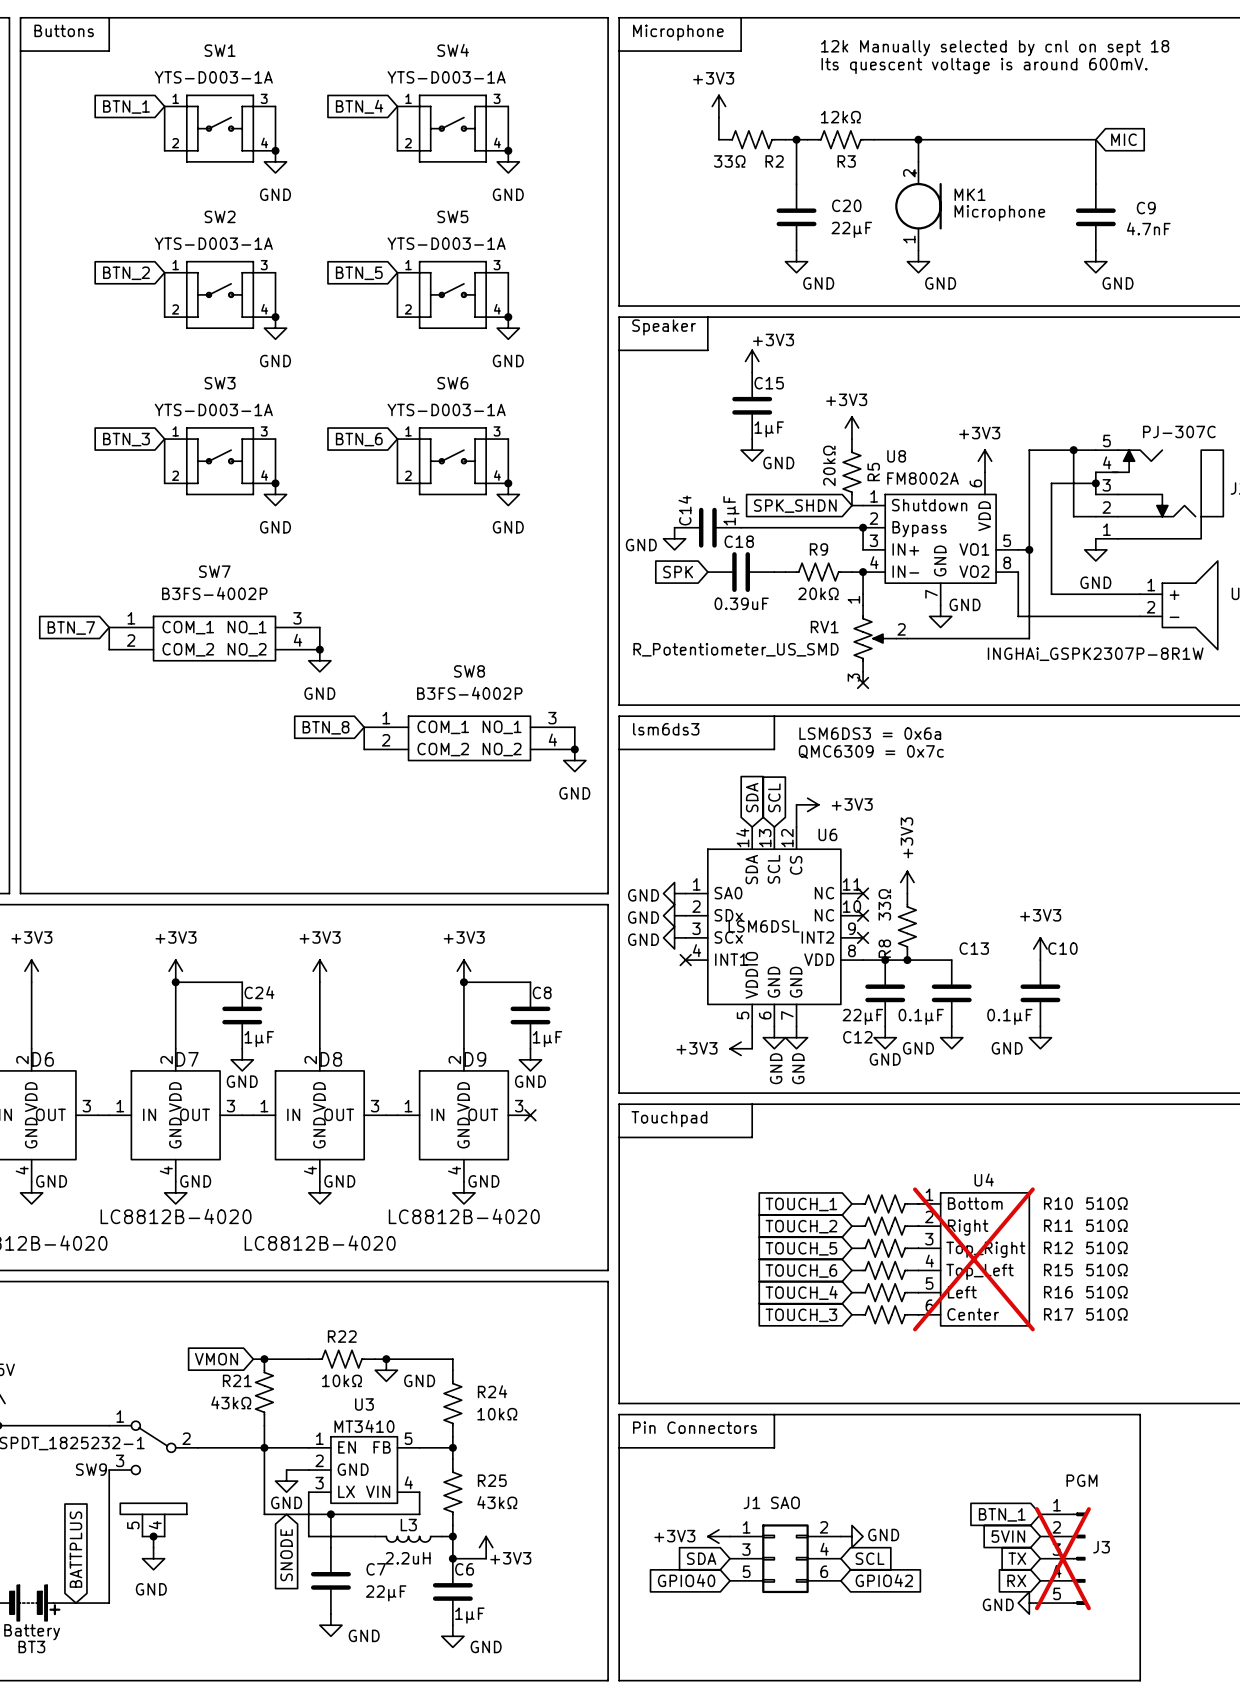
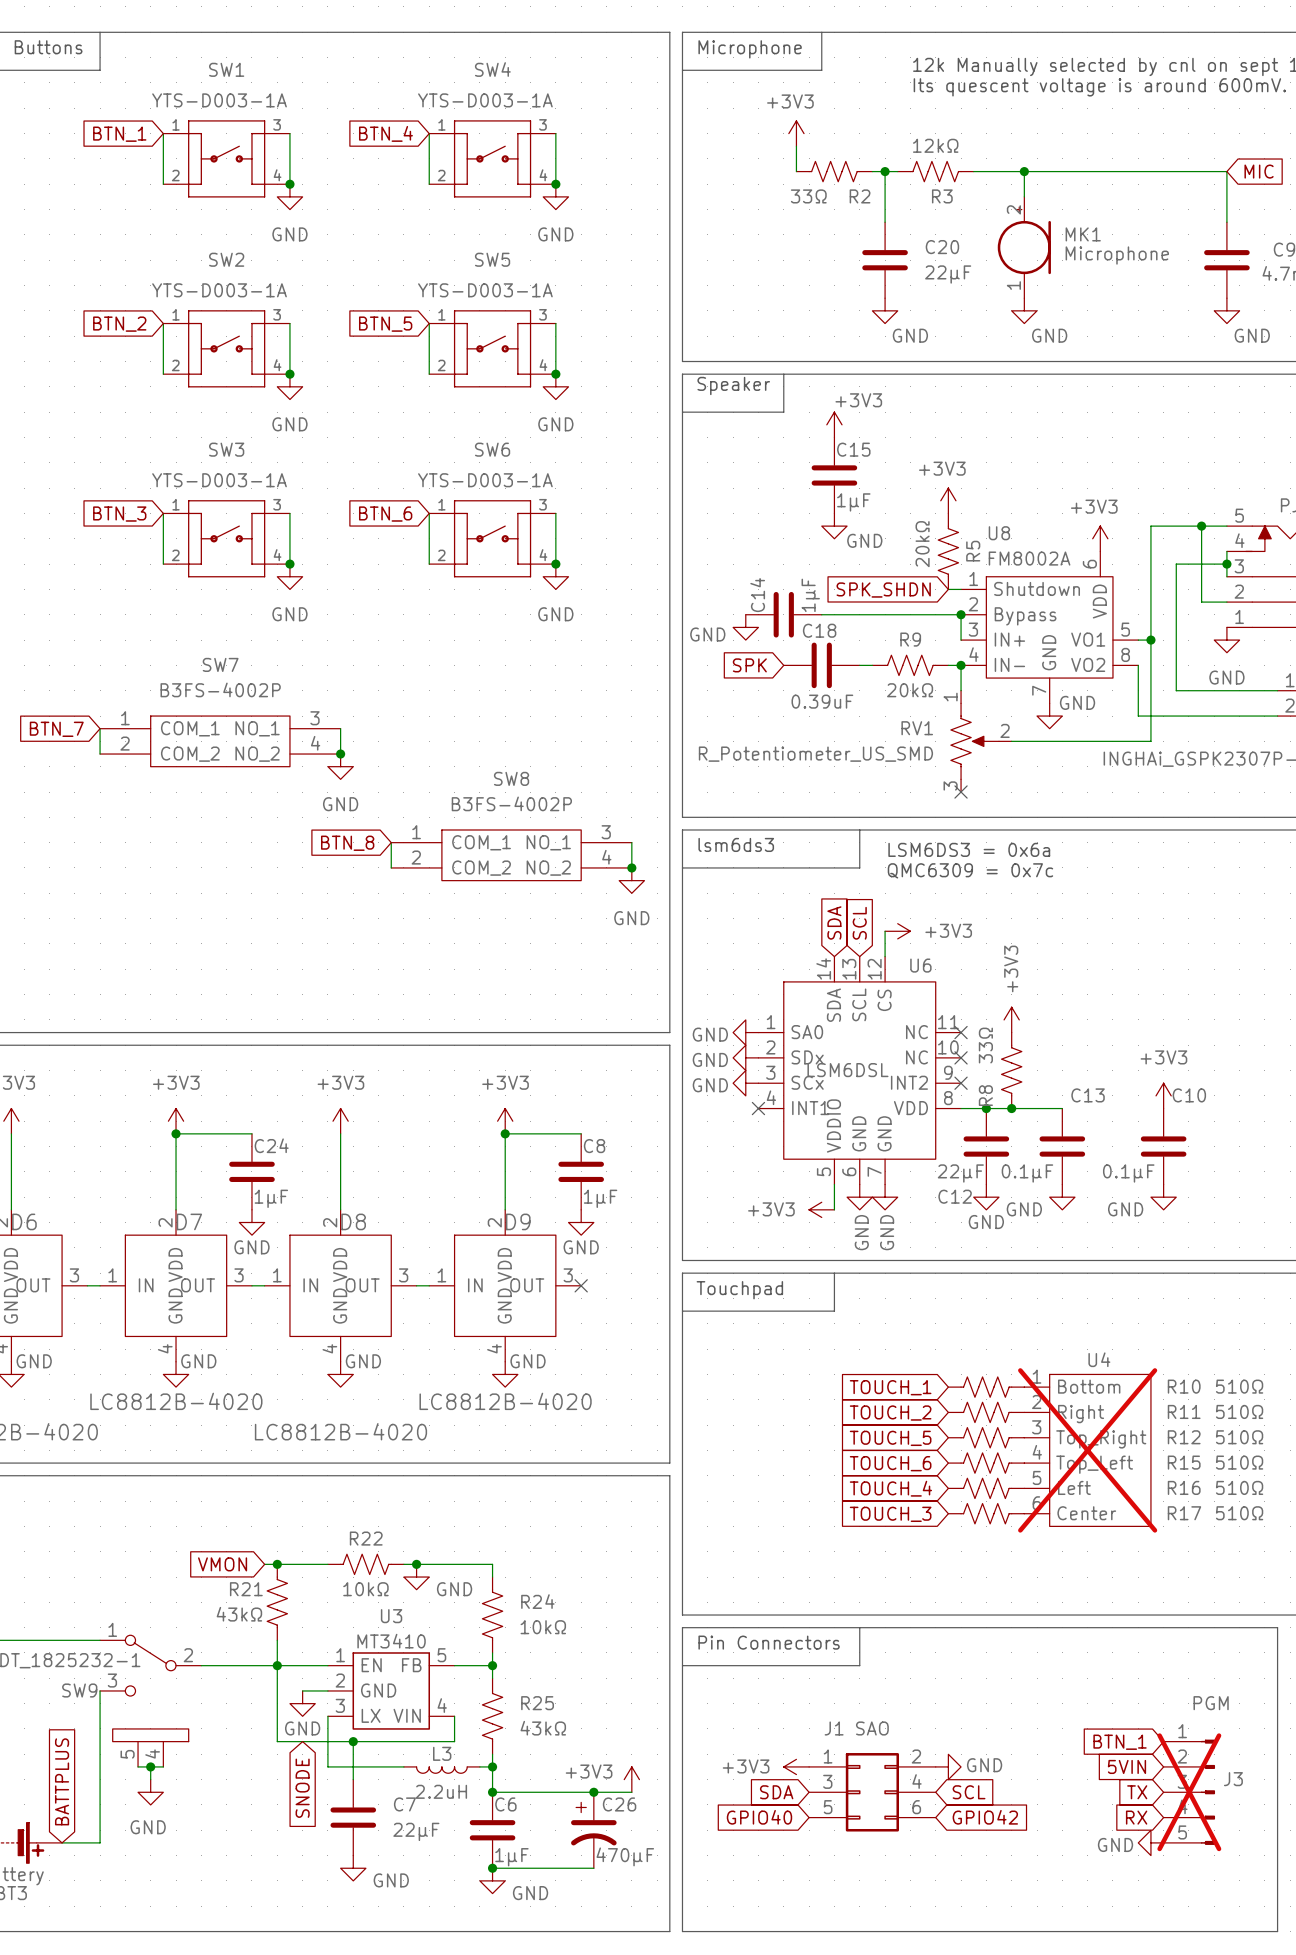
power symbol position: +3V3 (486, 1547) -> +3V3 (631, 1779)
wire: none -> (530, 1792) (631, 1792)
power symbol text position: +3V3 (510, 1558) -> +3V3 (589, 1771)
junction: none -> (593, 1792)
C26: none -> 470μF (593, 1830)
wire: none -> (492, 1868) (593, 1868)
junction: none -> (492, 1868)

